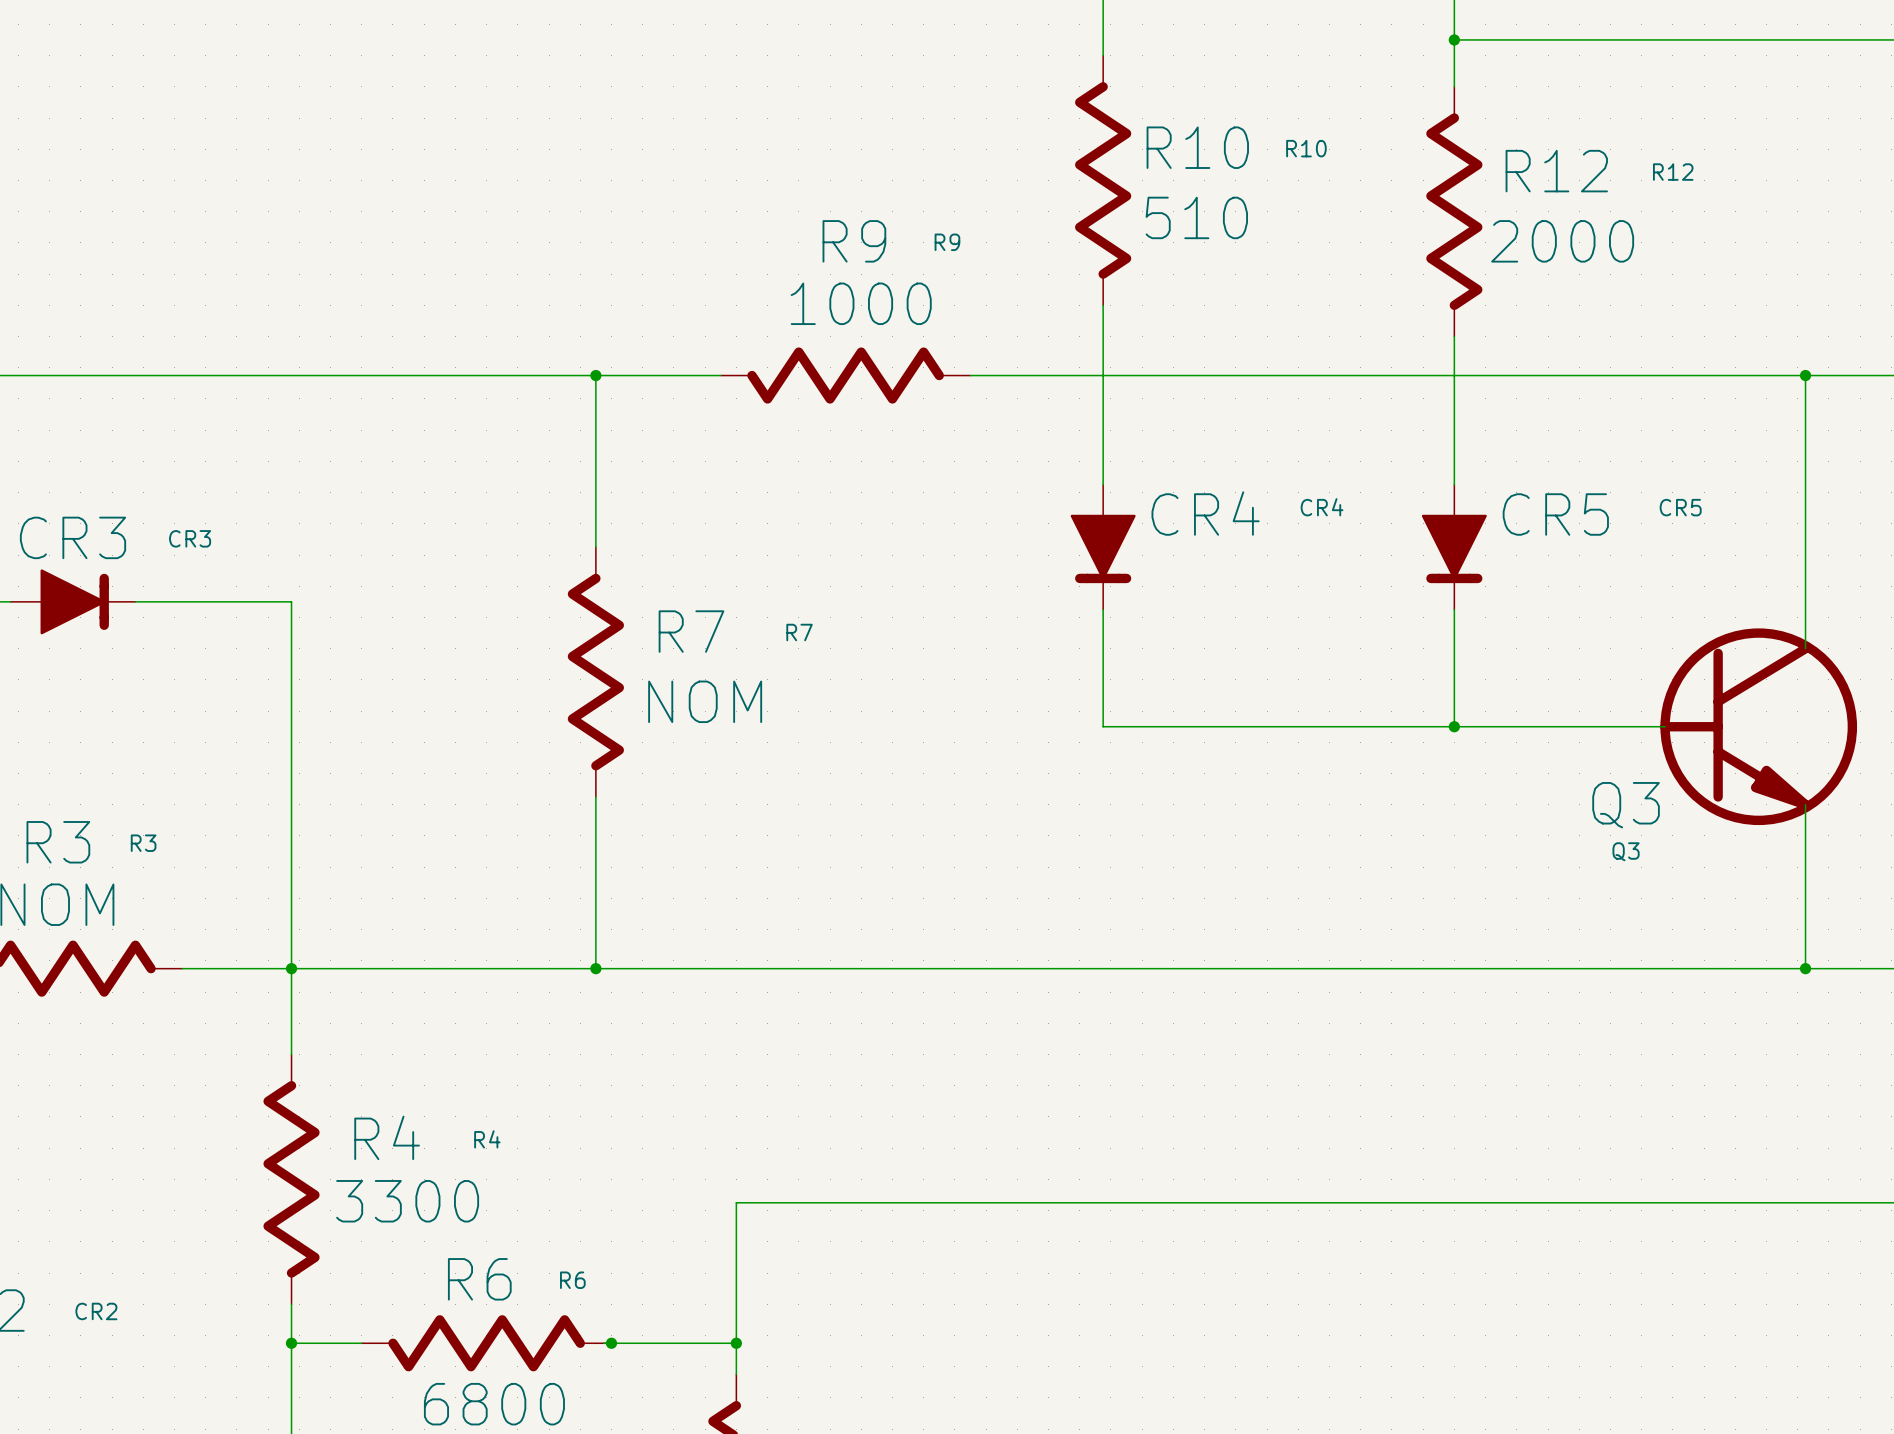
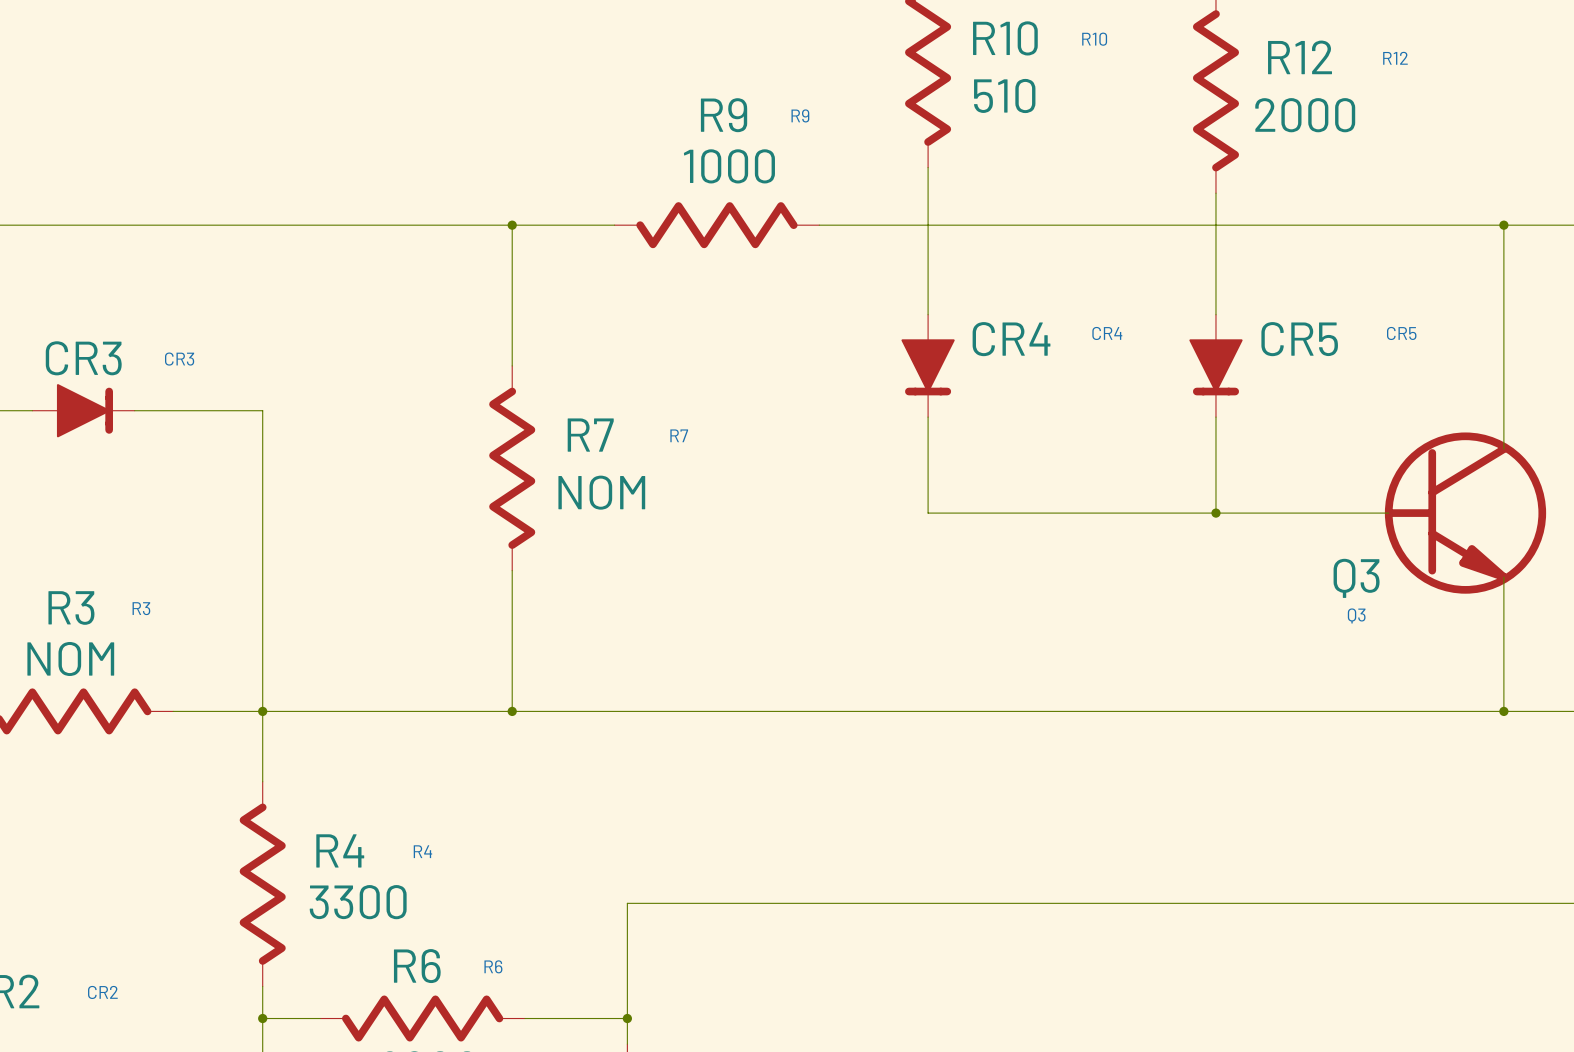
junction: (611, 1343) -> none

